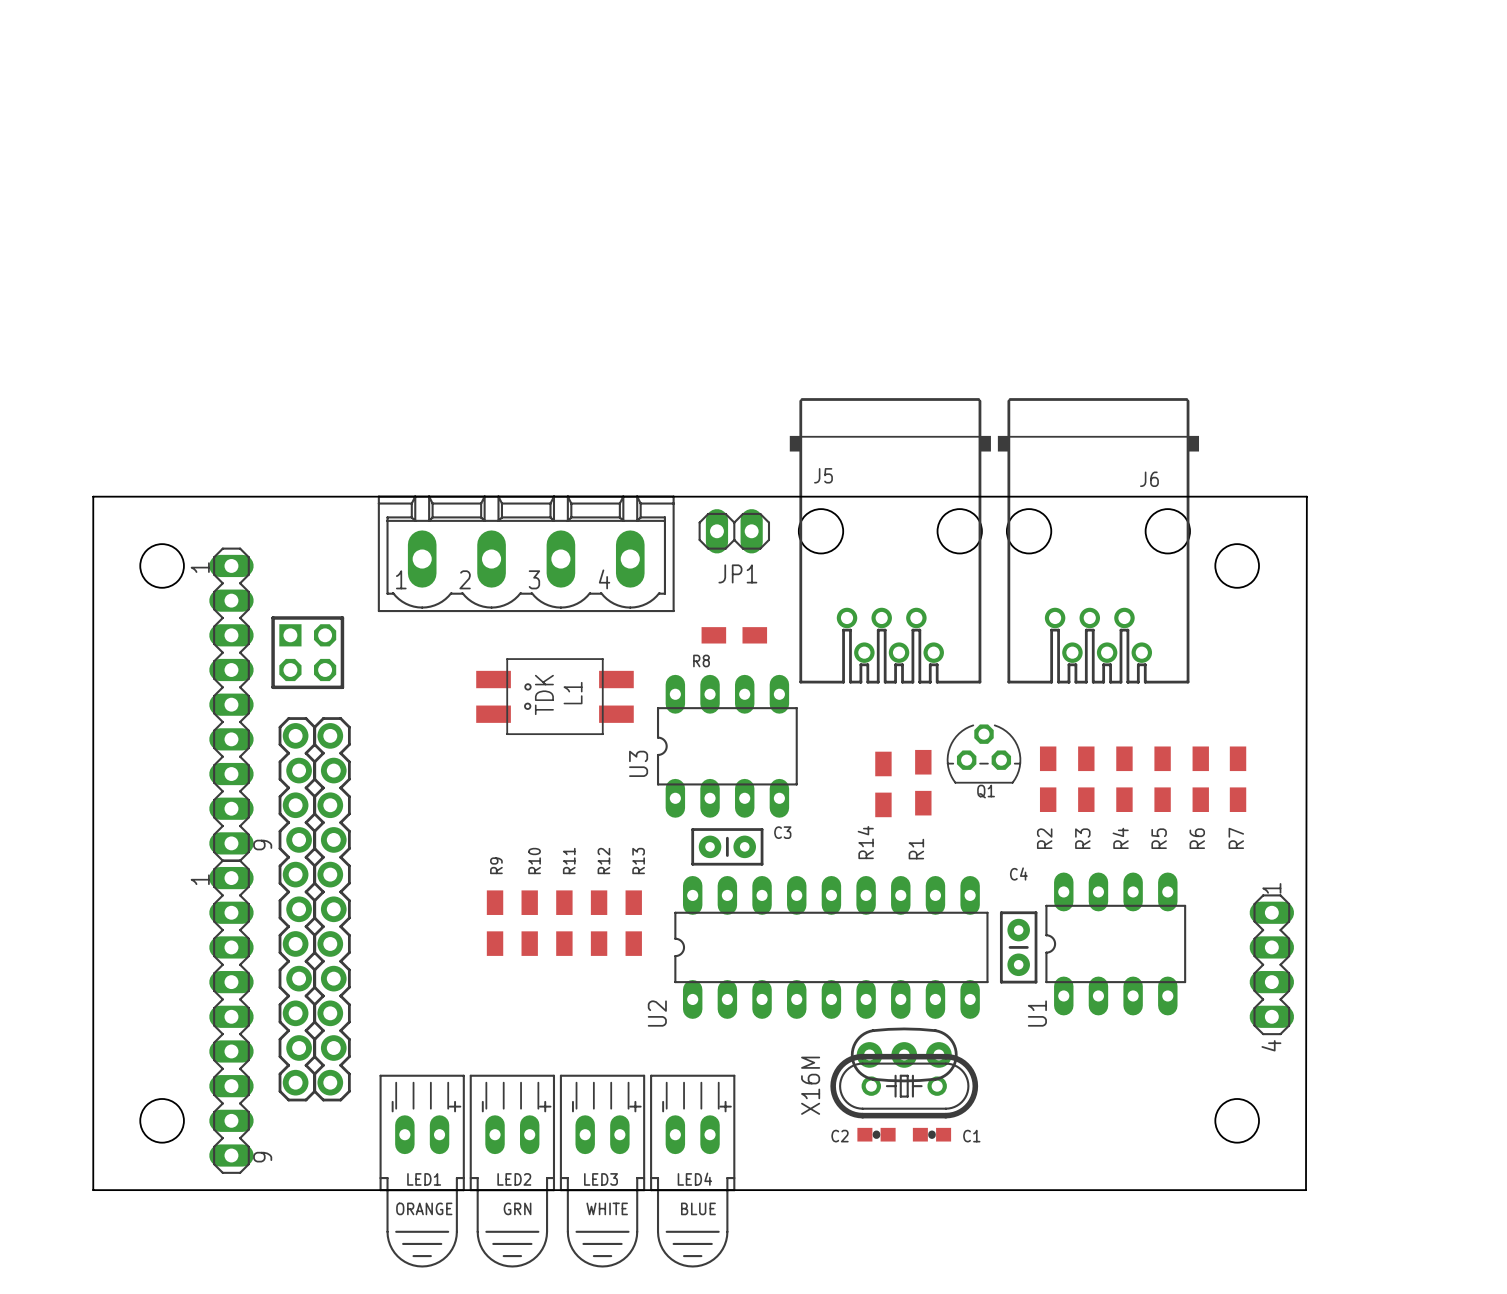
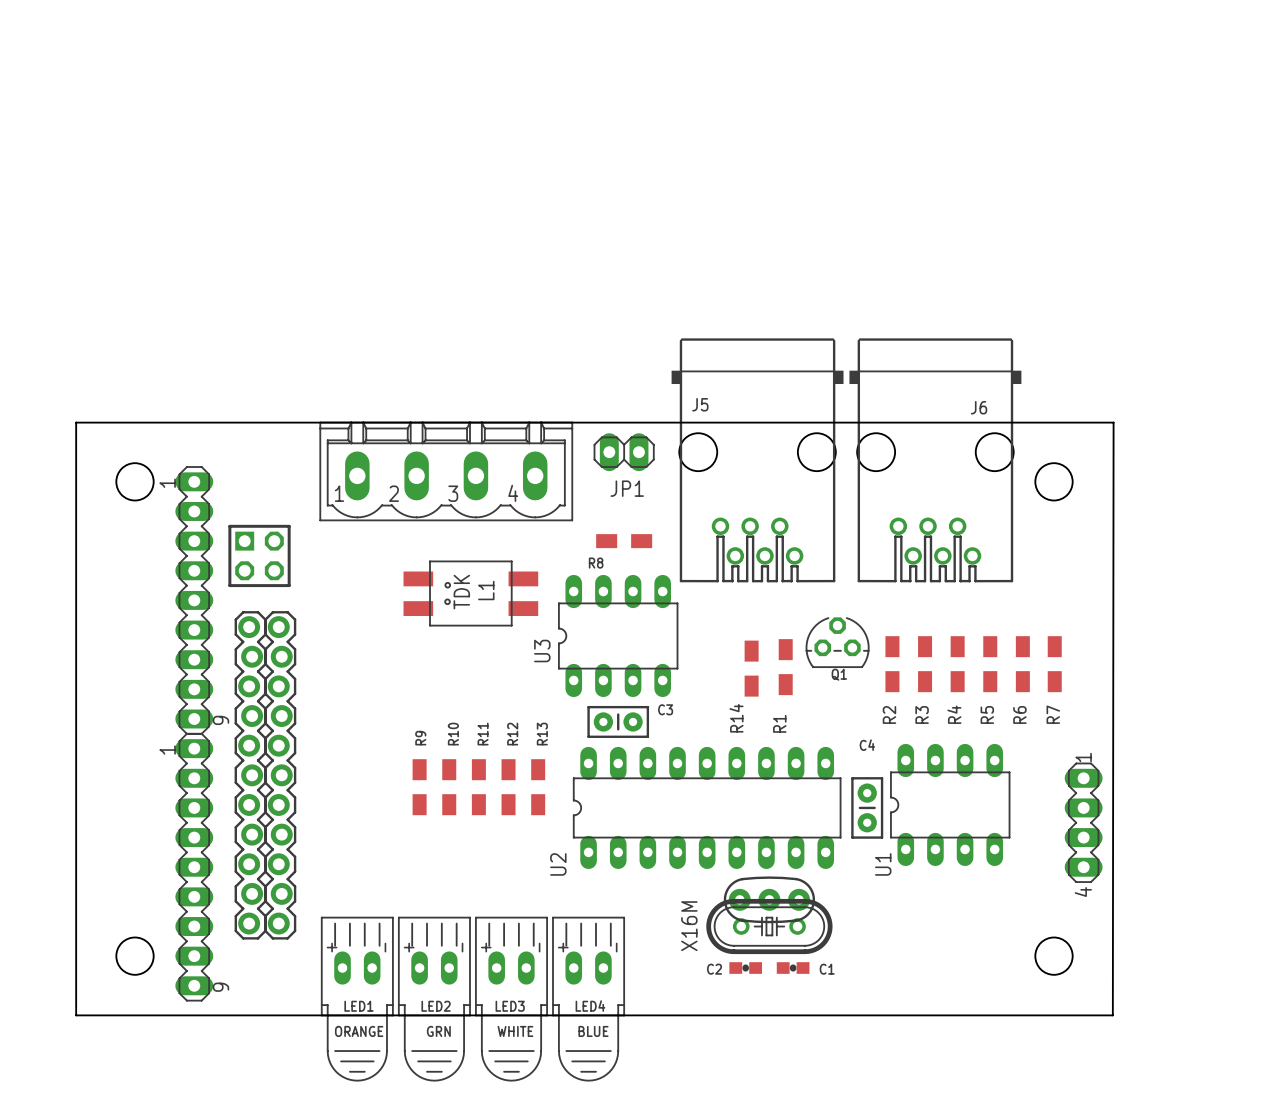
LED1 text position: - (392, 1106) -> - (385, 947)
LED1 text position: + (455, 1106) -> + (332, 947)
LED2 text position: - (482, 1106) -> - (462, 947)
LED2 text position: + (545, 1106) -> + (409, 947)
LED3 text position: - (572, 1106) -> - (539, 947)
LED3 text position: + (635, 1106) -> + (486, 947)
LED4 text position: - (663, 1106) -> - (616, 947)
LED4 text position: + (725, 1106) -> + (563, 947)

